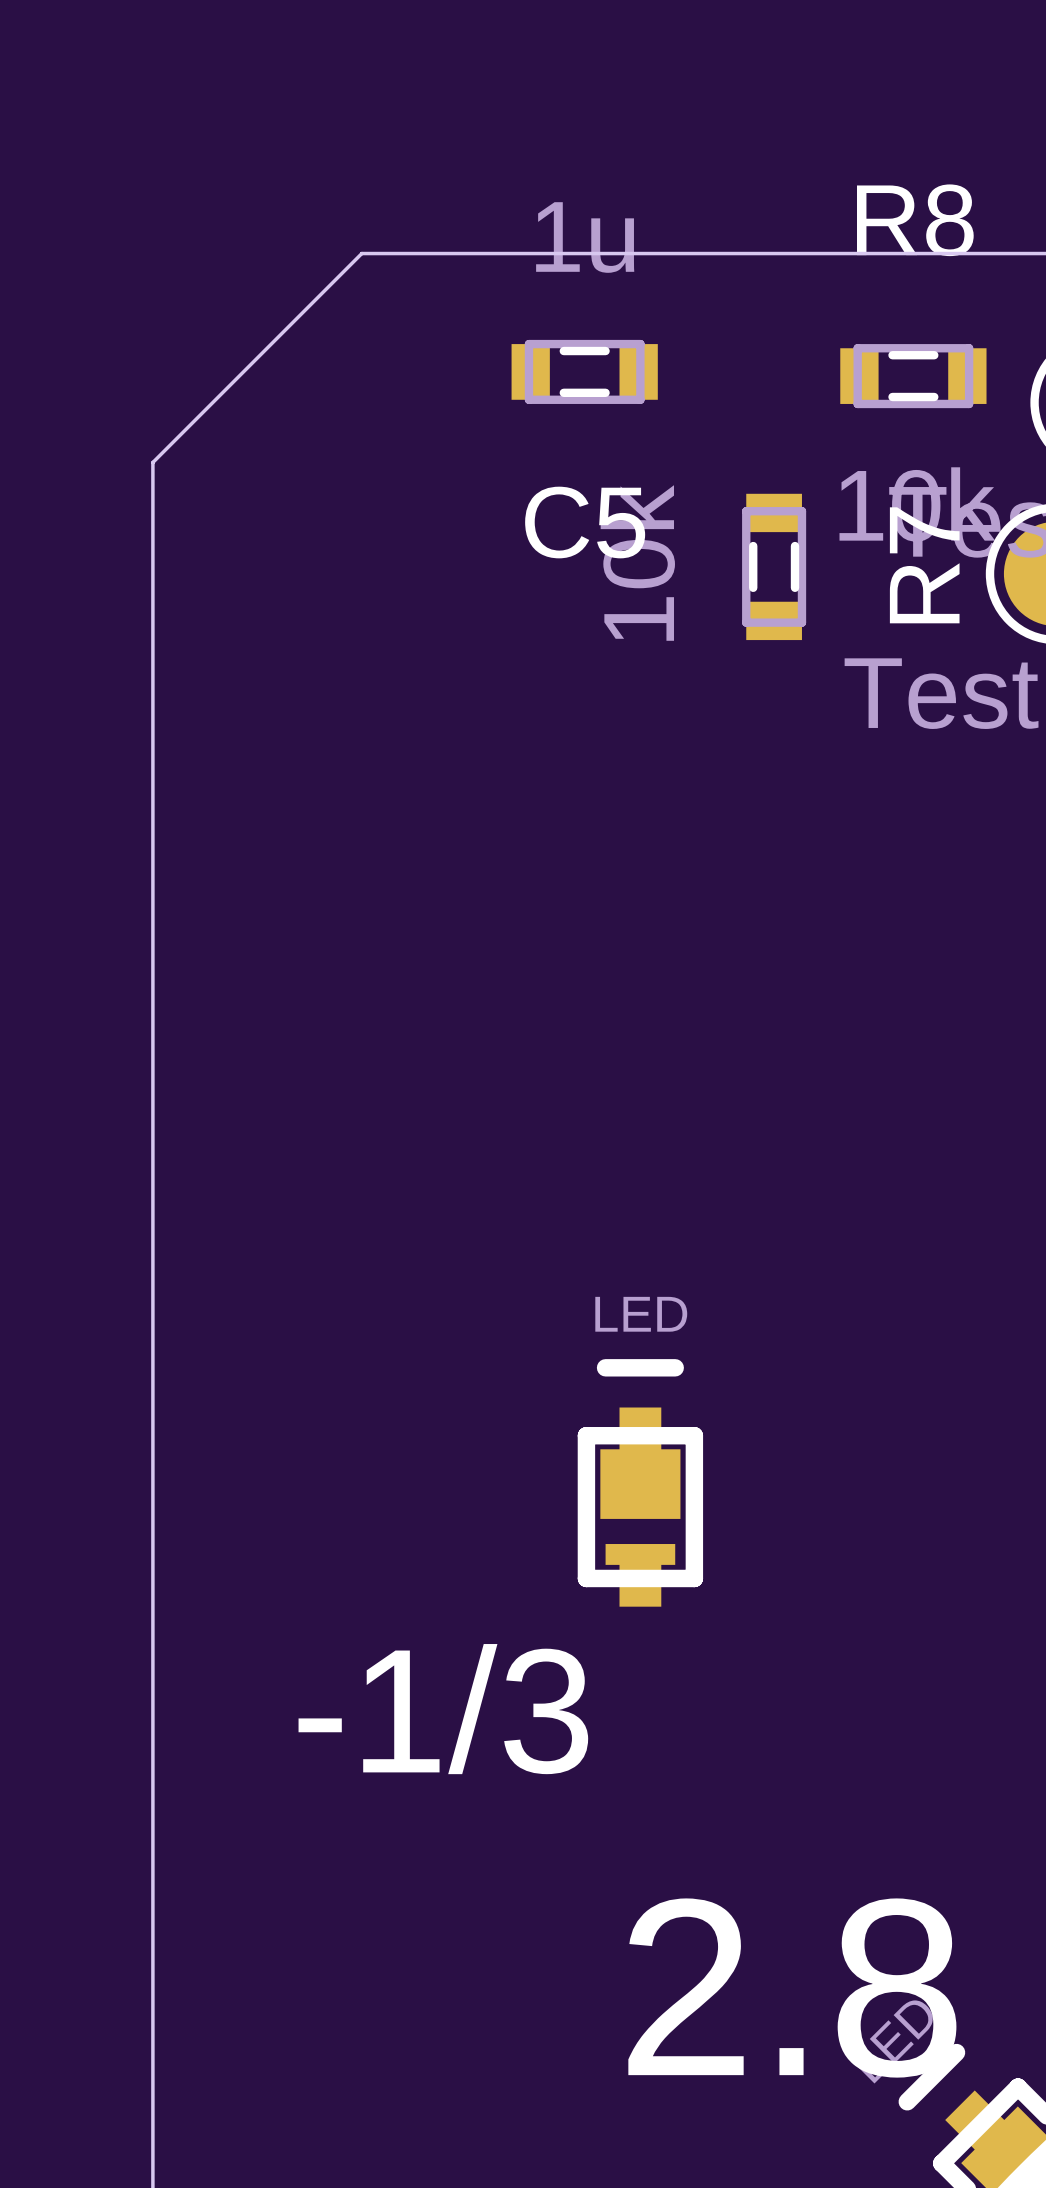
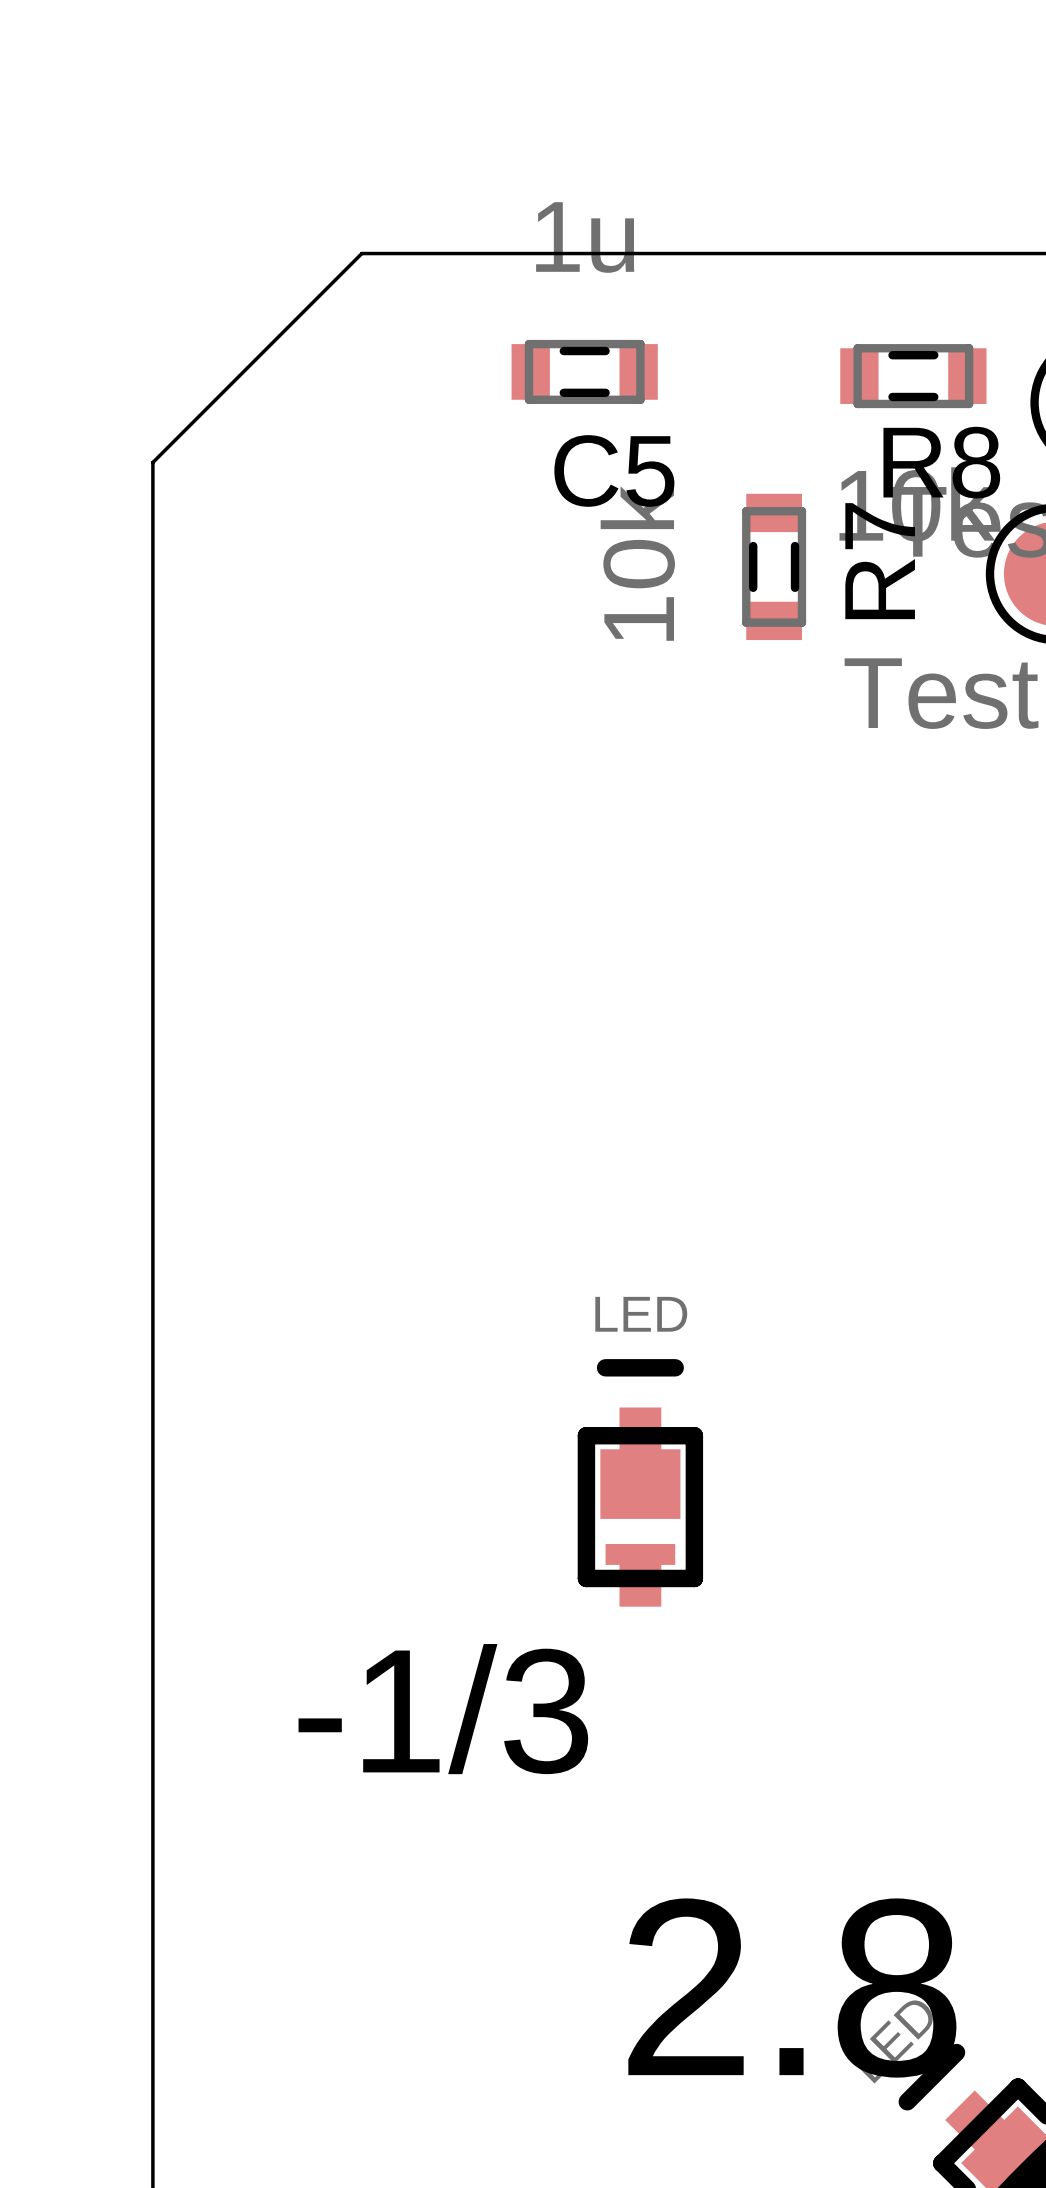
R8 name position: R8 (915, 220) -> R8 (941, 462)
C5 name position: C5 (585, 522) -> C5 (614, 470)
R7 name position: R7 (924, 565) -> R7 (880, 561)

